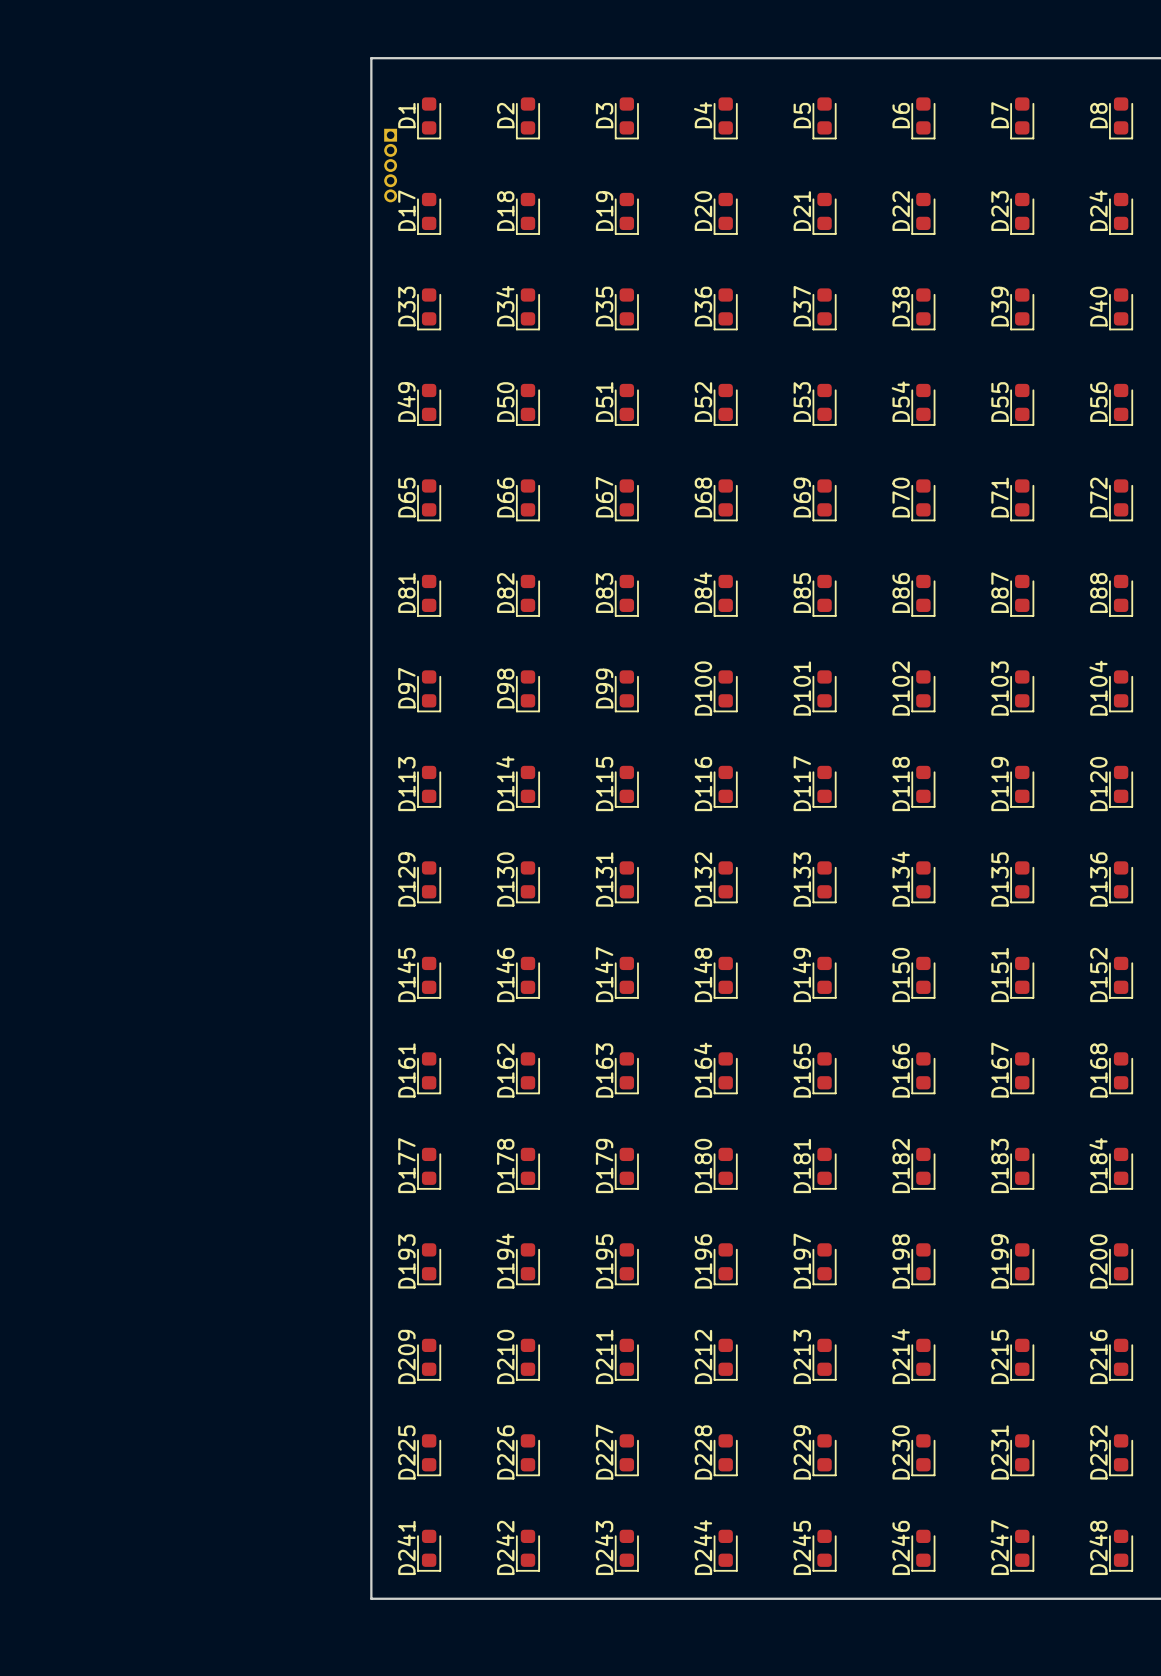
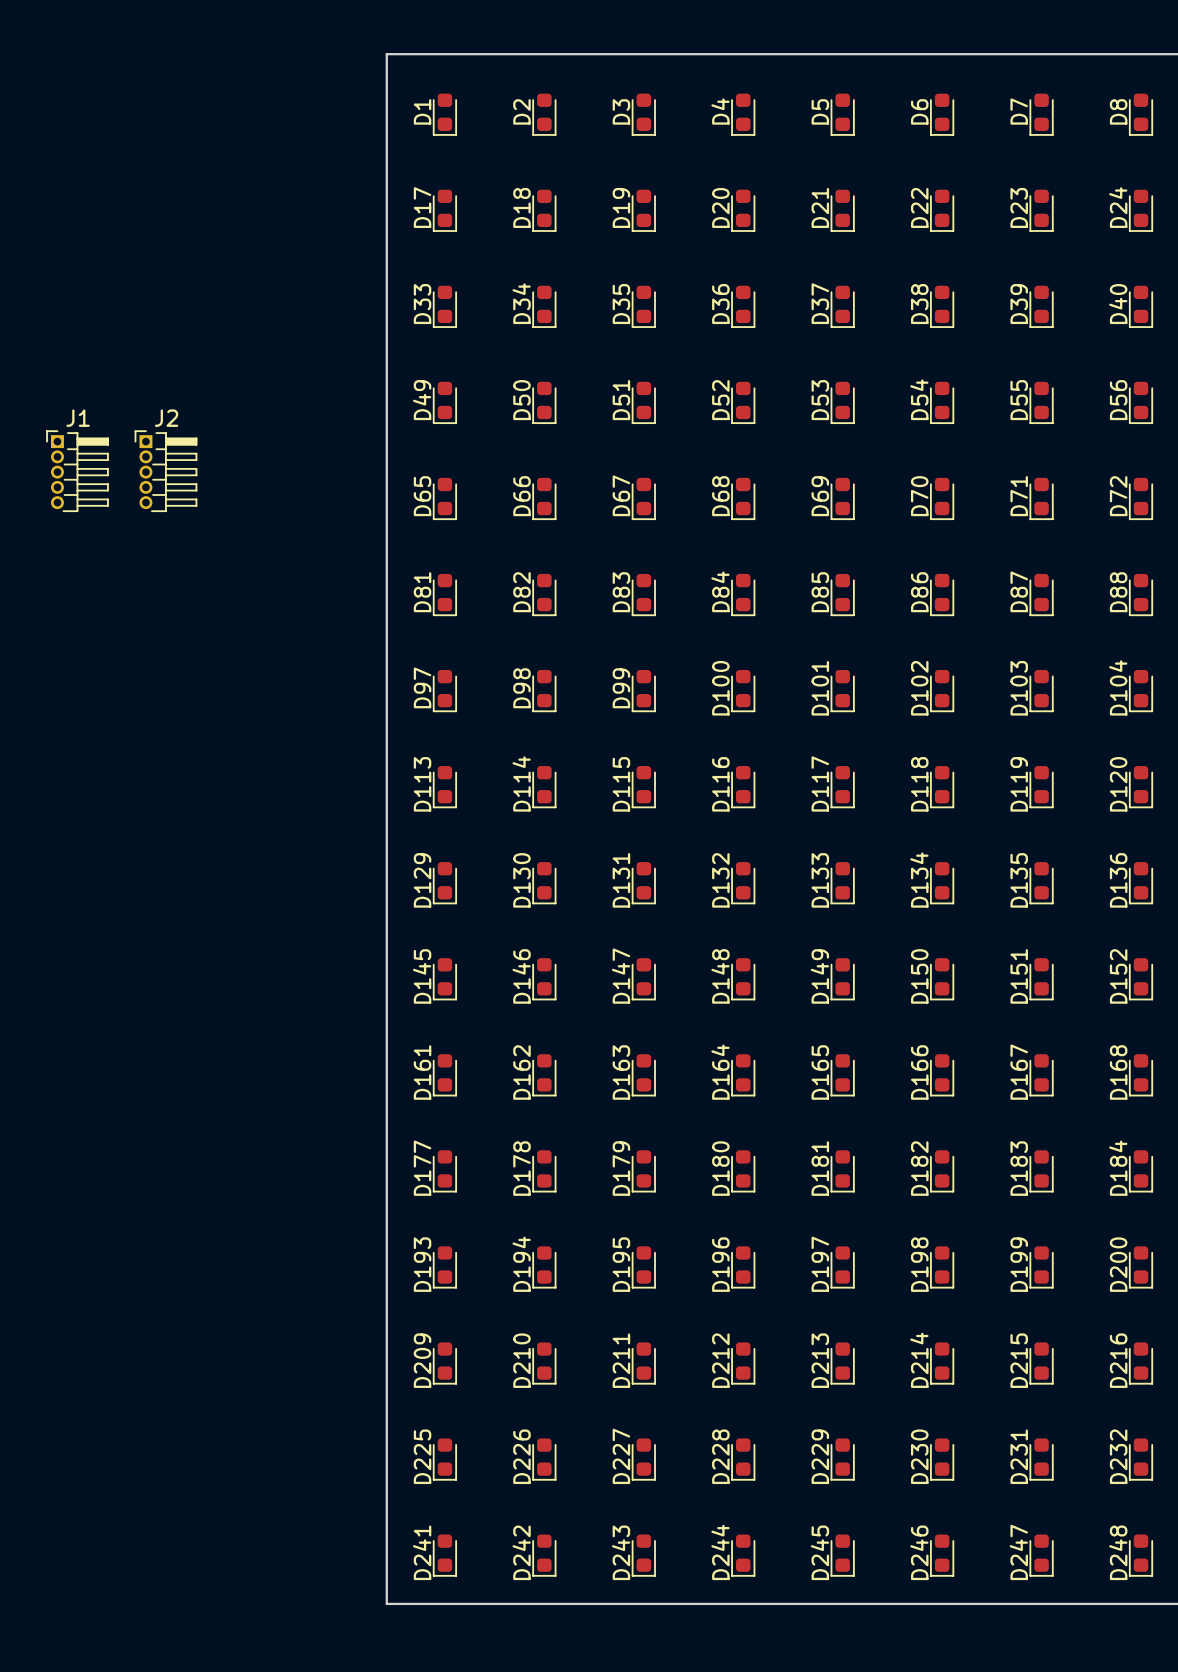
part: (390, 165) -> none
J1: none -> (77, 471)
J2: none -> (165, 471)

